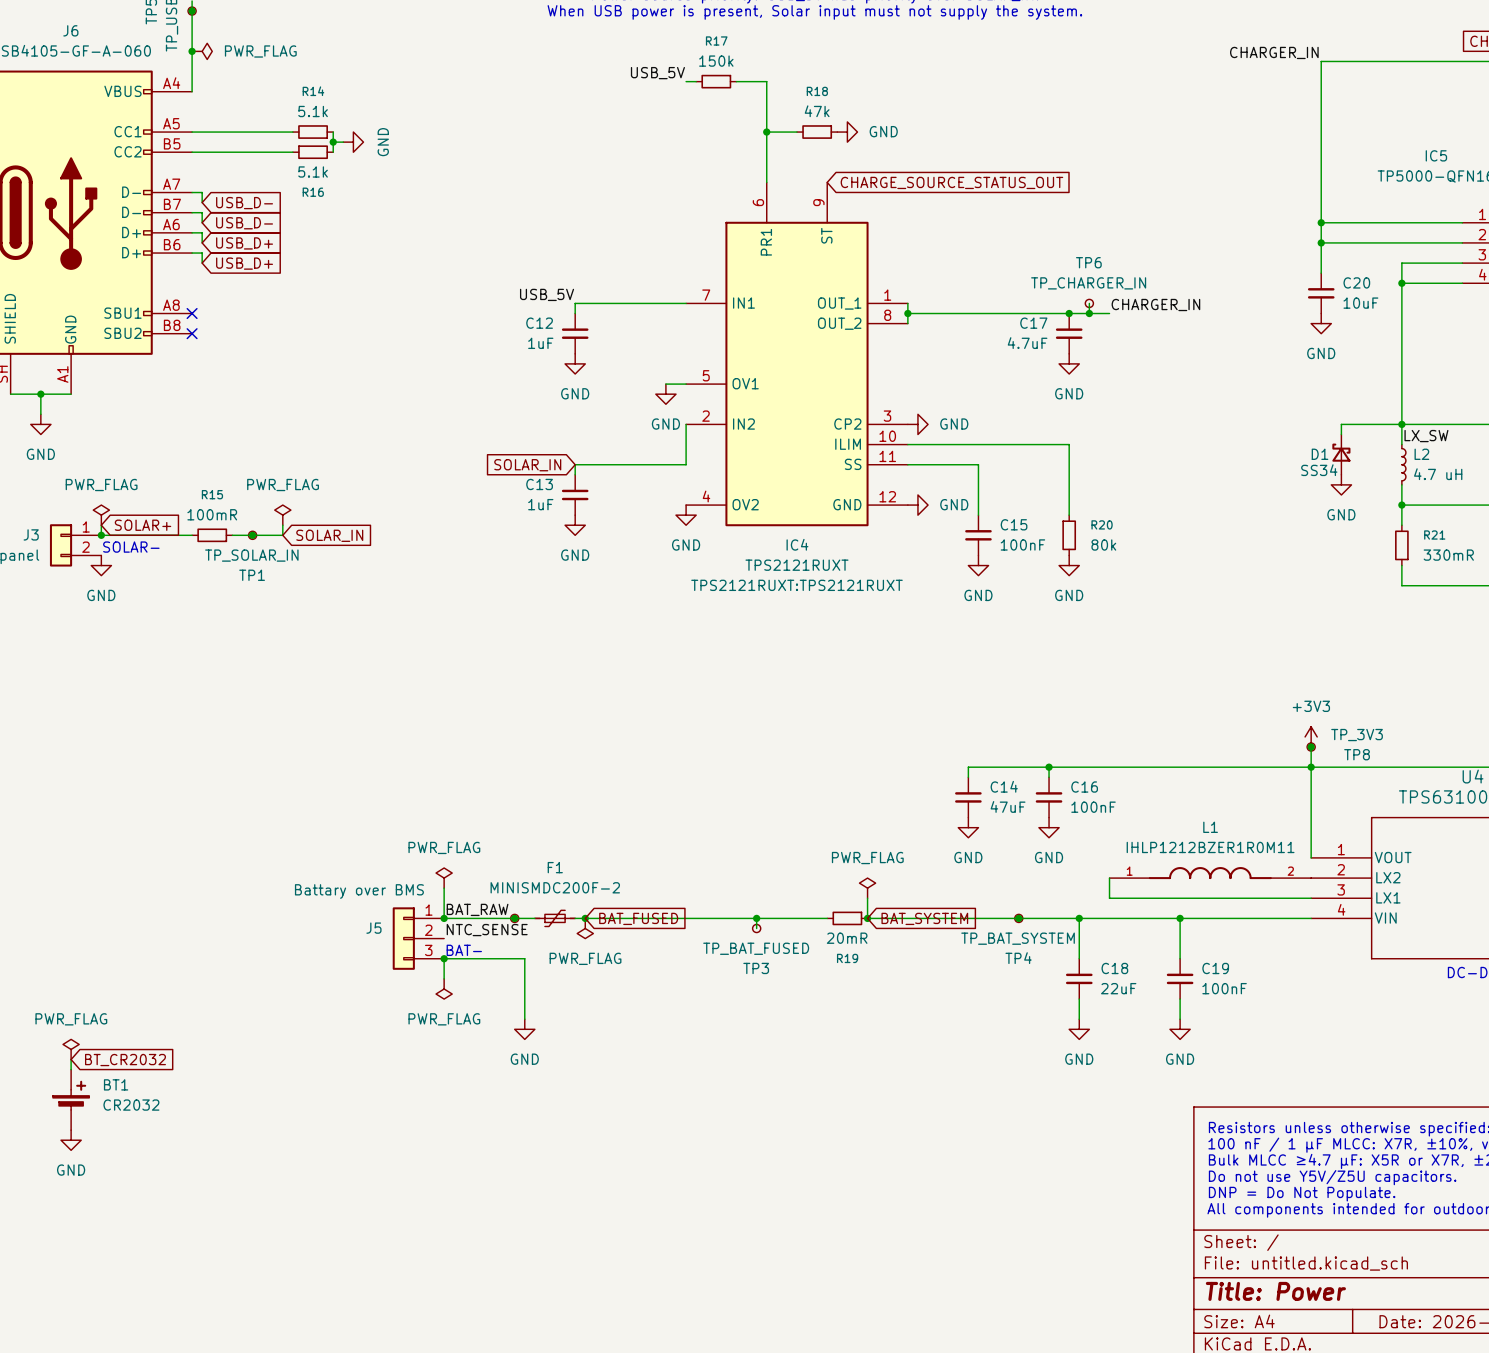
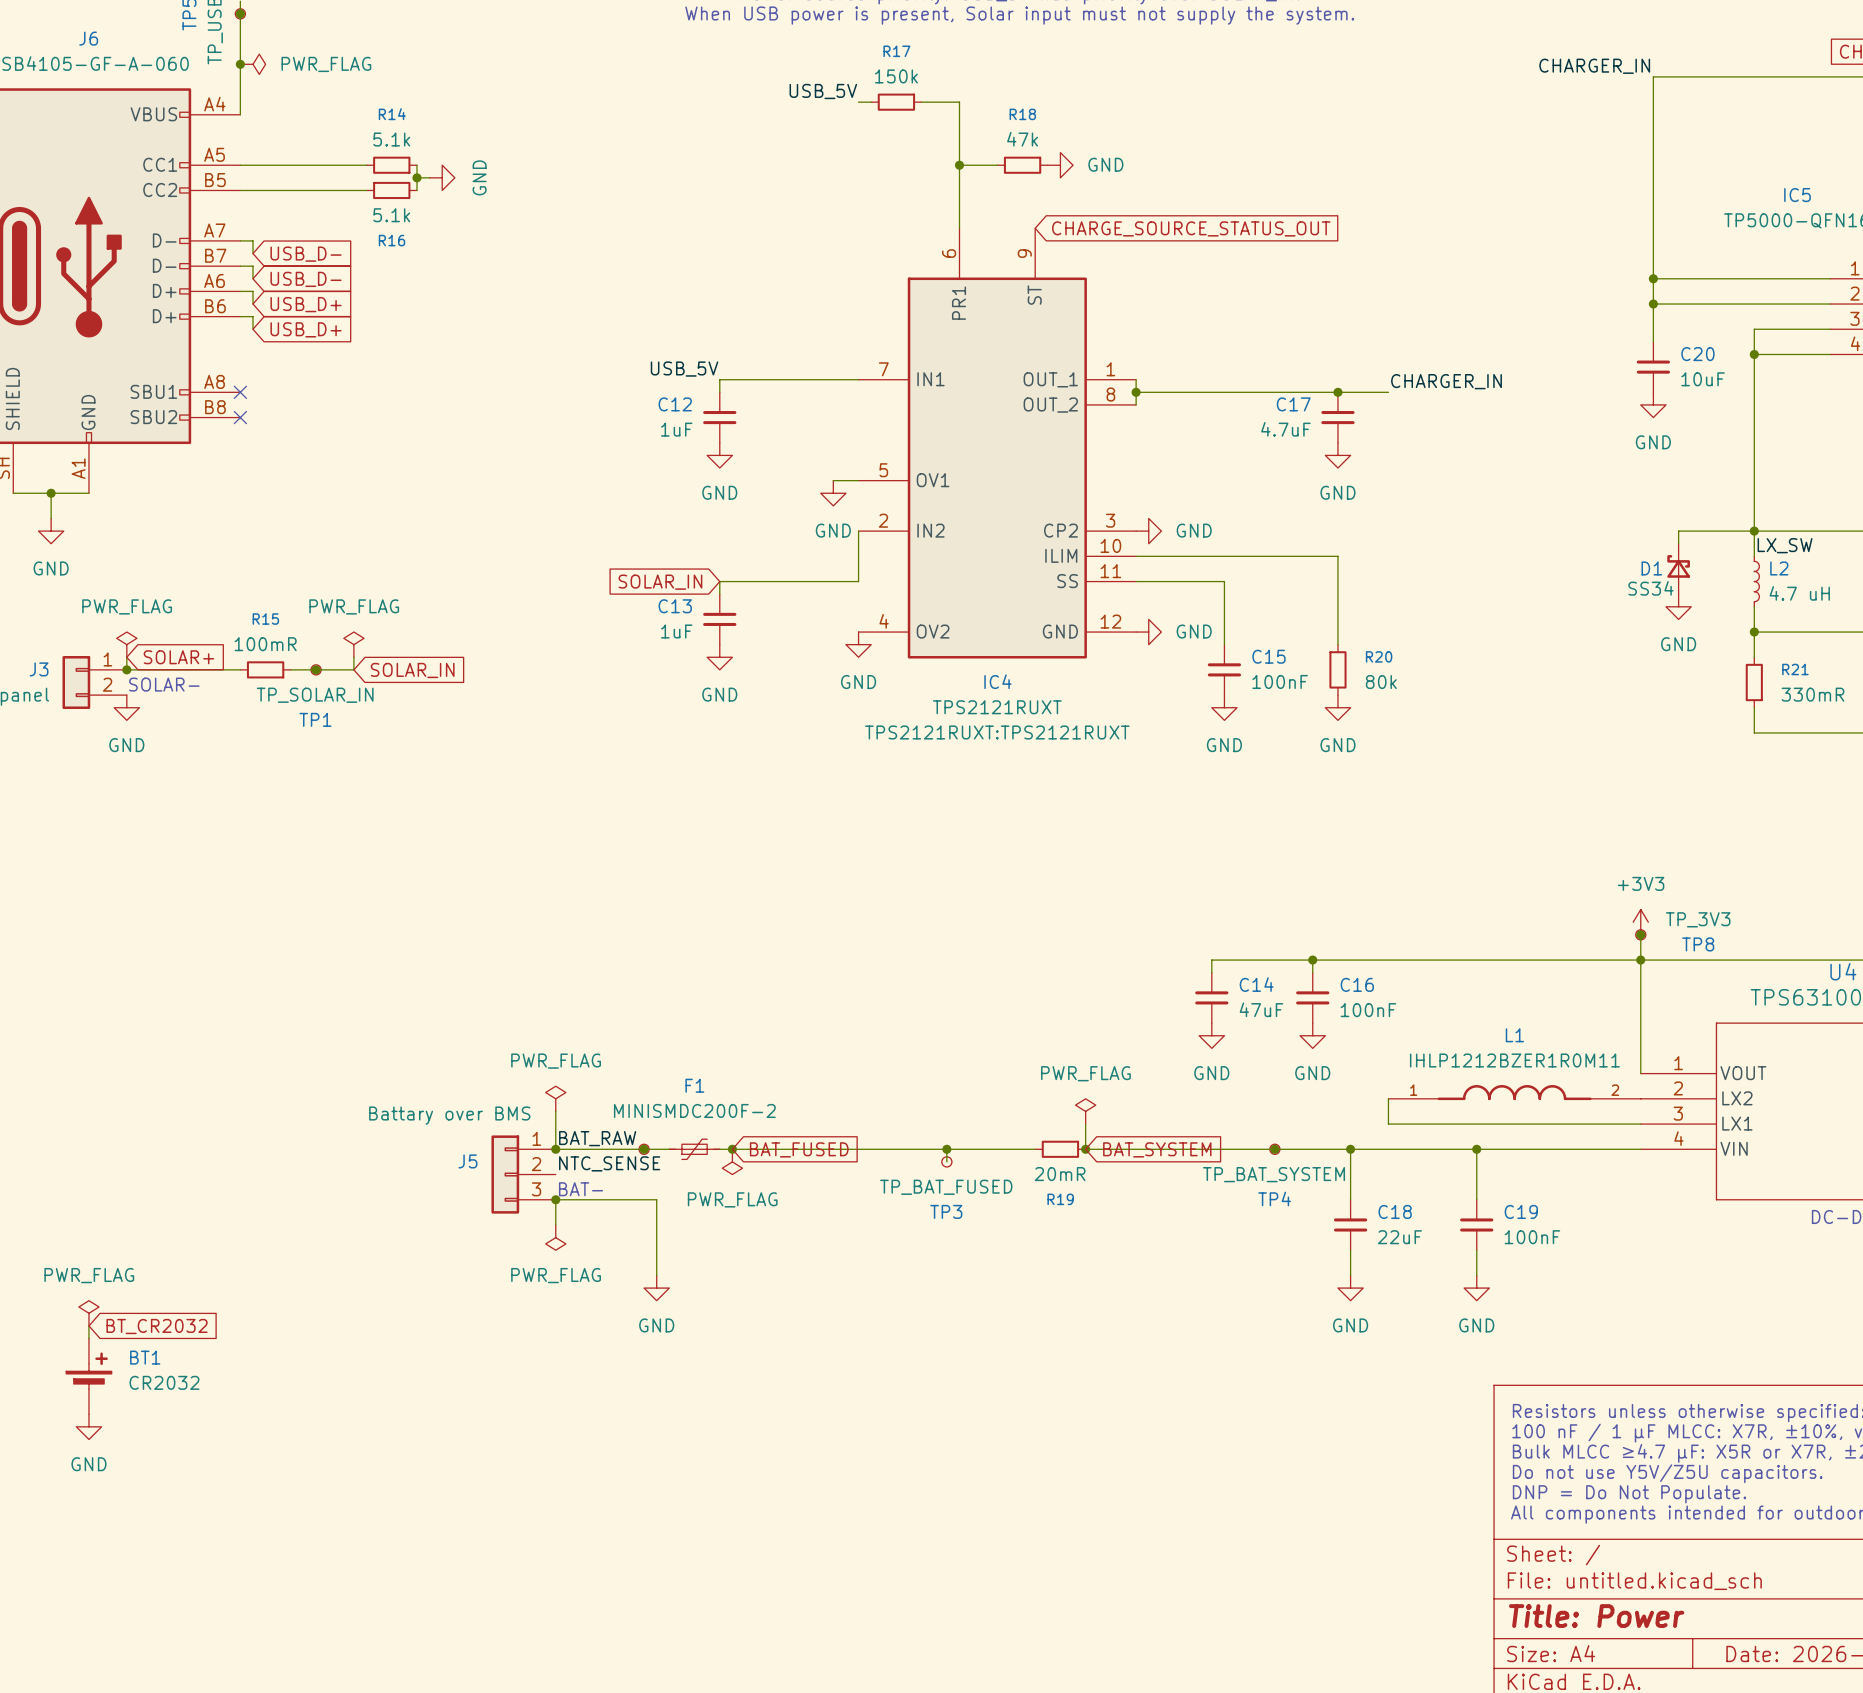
wire: (1089, 303) (1089, 313) -> none
TP6: TP_CHARGER_IN (1089, 303) -> none
junction: (1089, 313) -> none

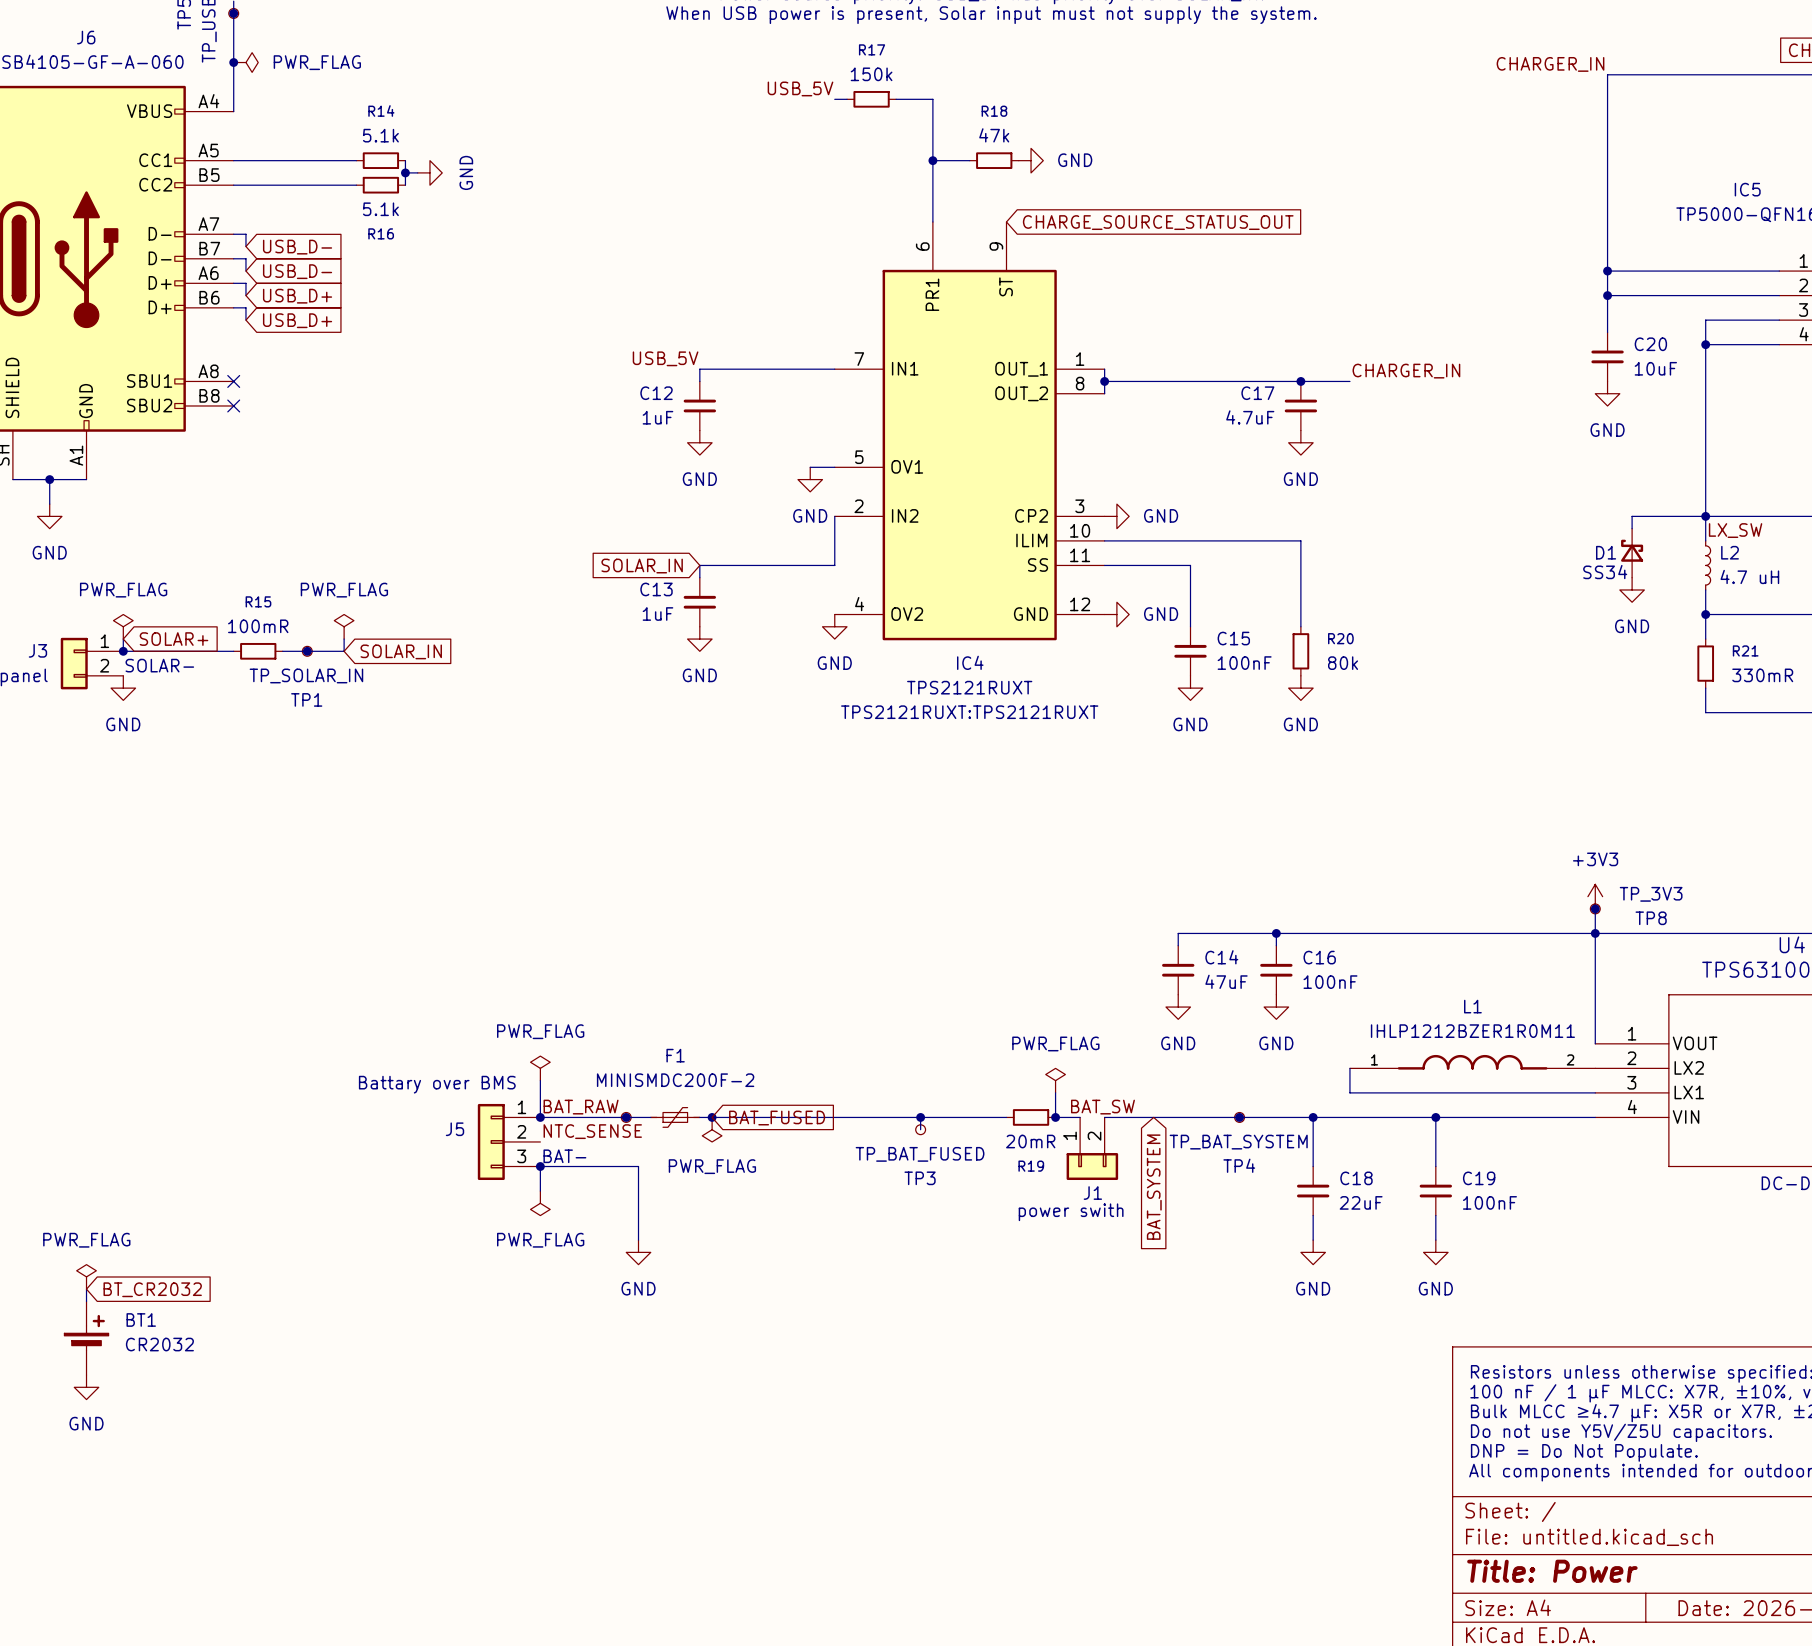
label: none -> BAT_SW (1102, 1107)
wire: (1110, 1149) (1136, 1149) -> none
global label rotation: 0° (1157, 1149) -> 90° clockwise (1154, 1187)
J1: none -> power swith (1092, 1148)

